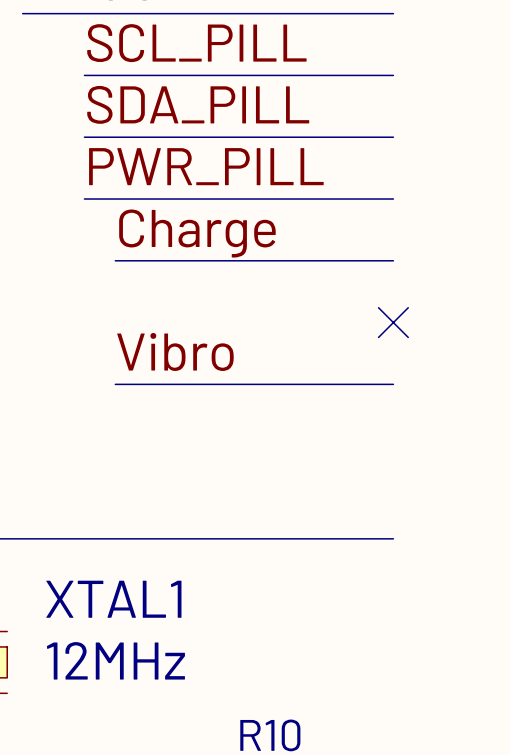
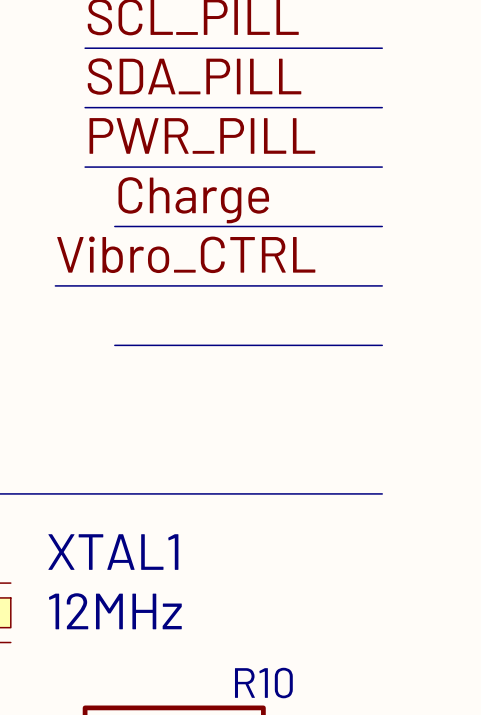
wire: none -> (55, 285) (382, 285)
no-connect mark: (393, 322) -> none
label: Vibro (175, 351) -> Vibro_CTRL (186, 254)

